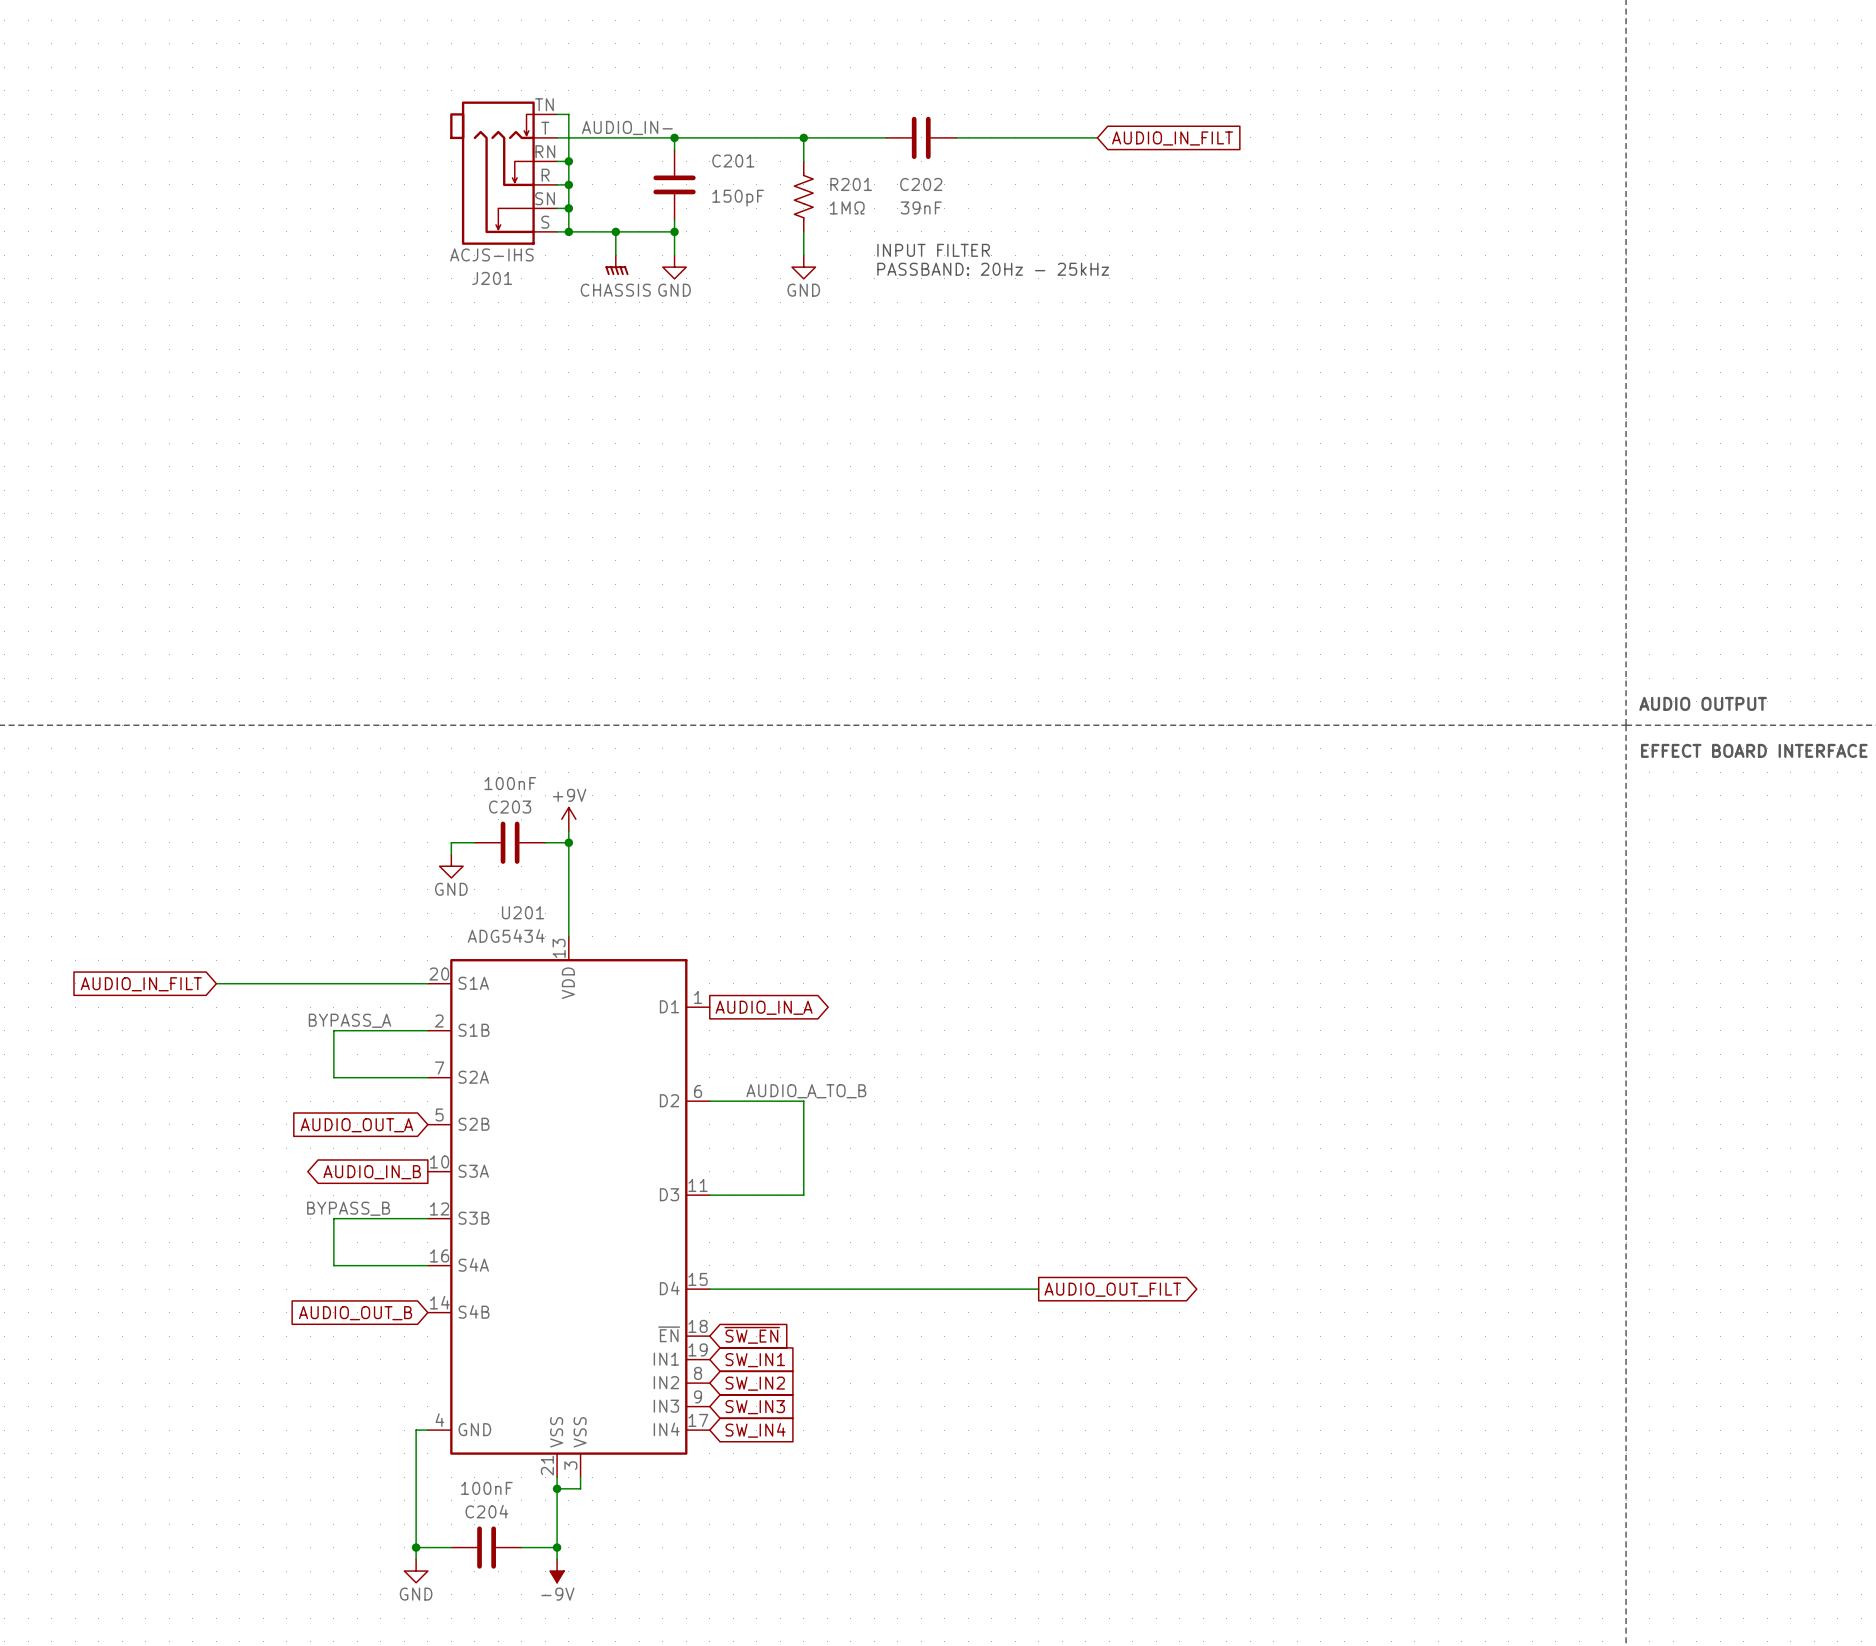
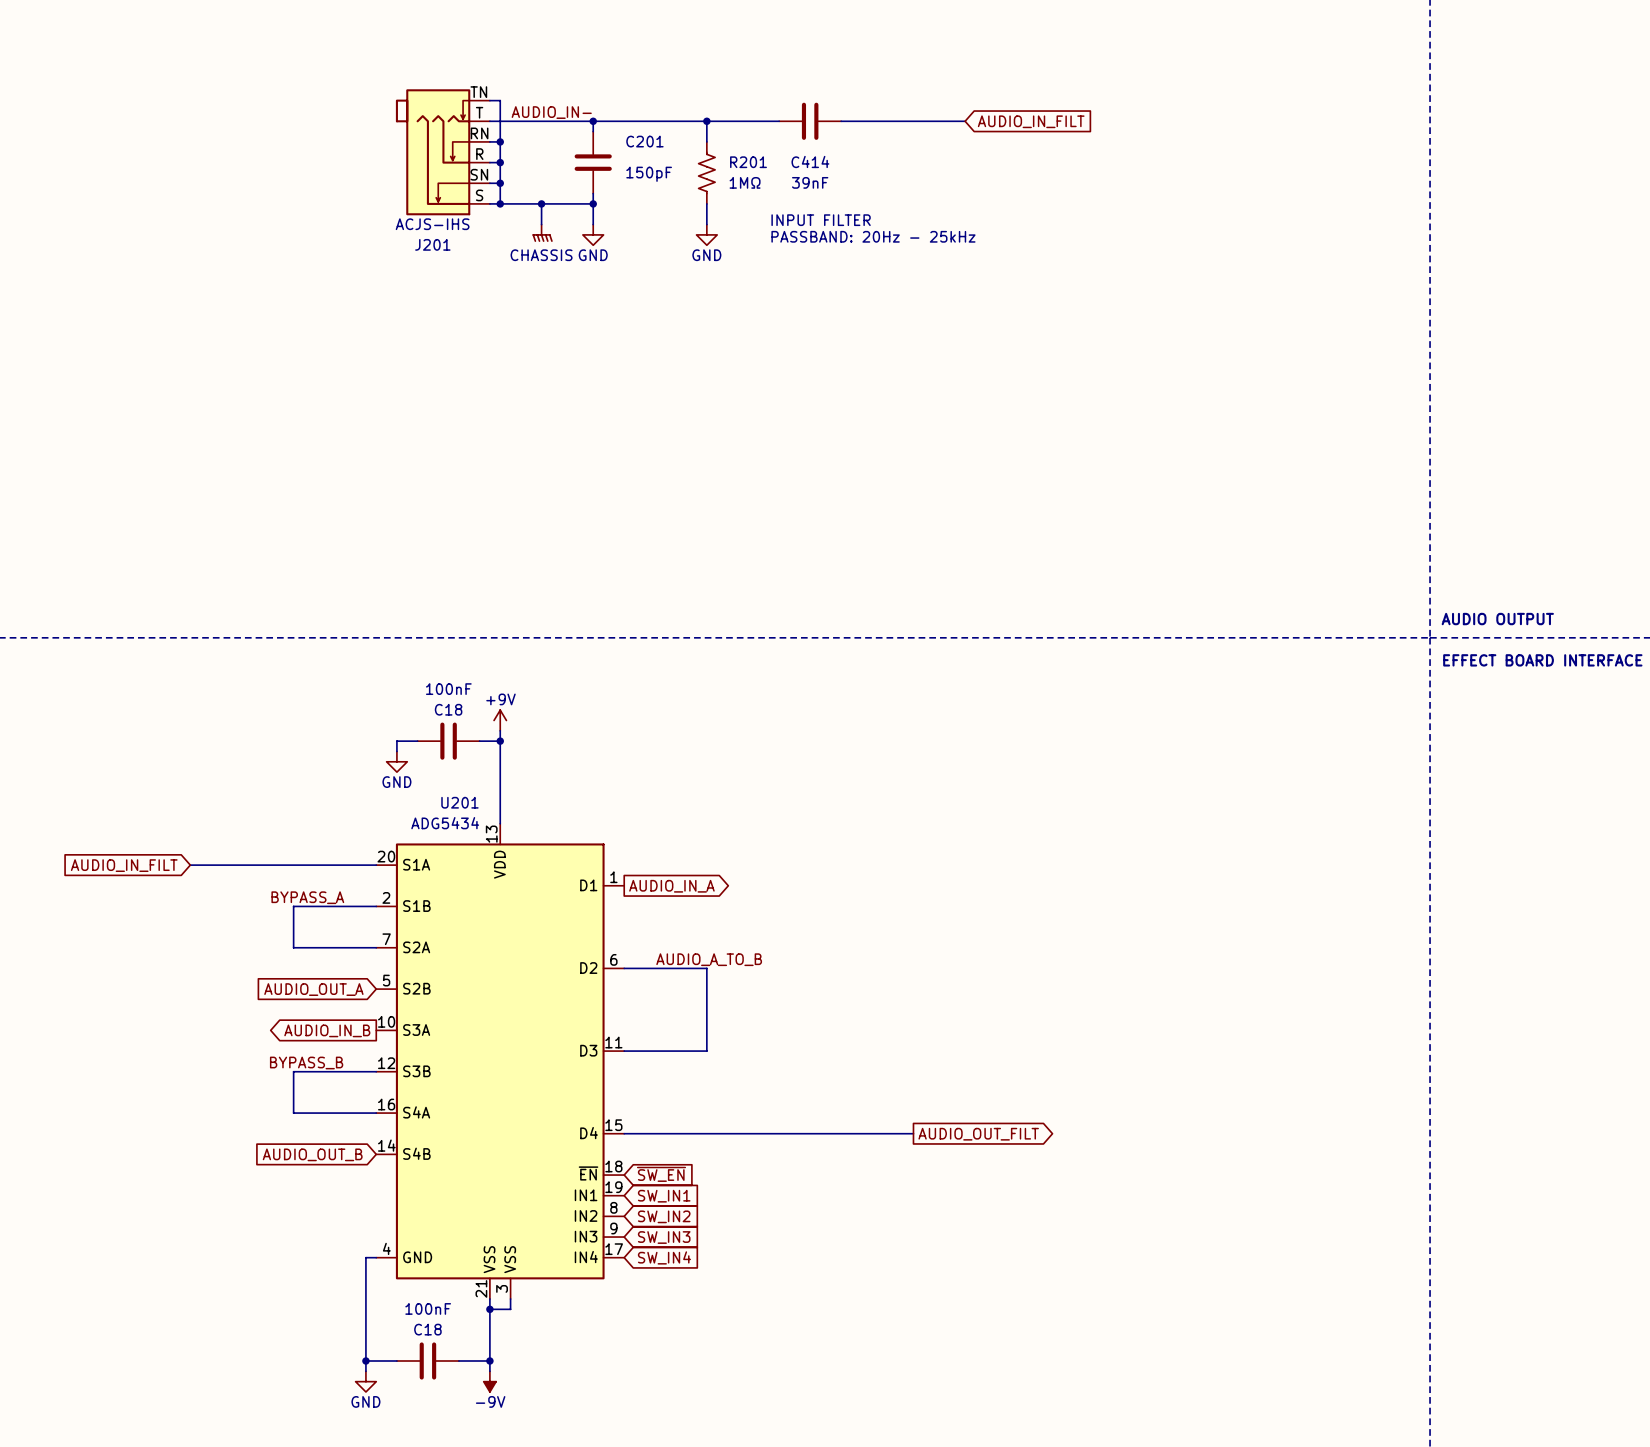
C202 name: C202 (921, 184) -> C414 (810, 161)
C203 name: C203 (510, 807) -> C18 (448, 709)
C204 name: C204 (486, 1511) -> C18 (427, 1329)

